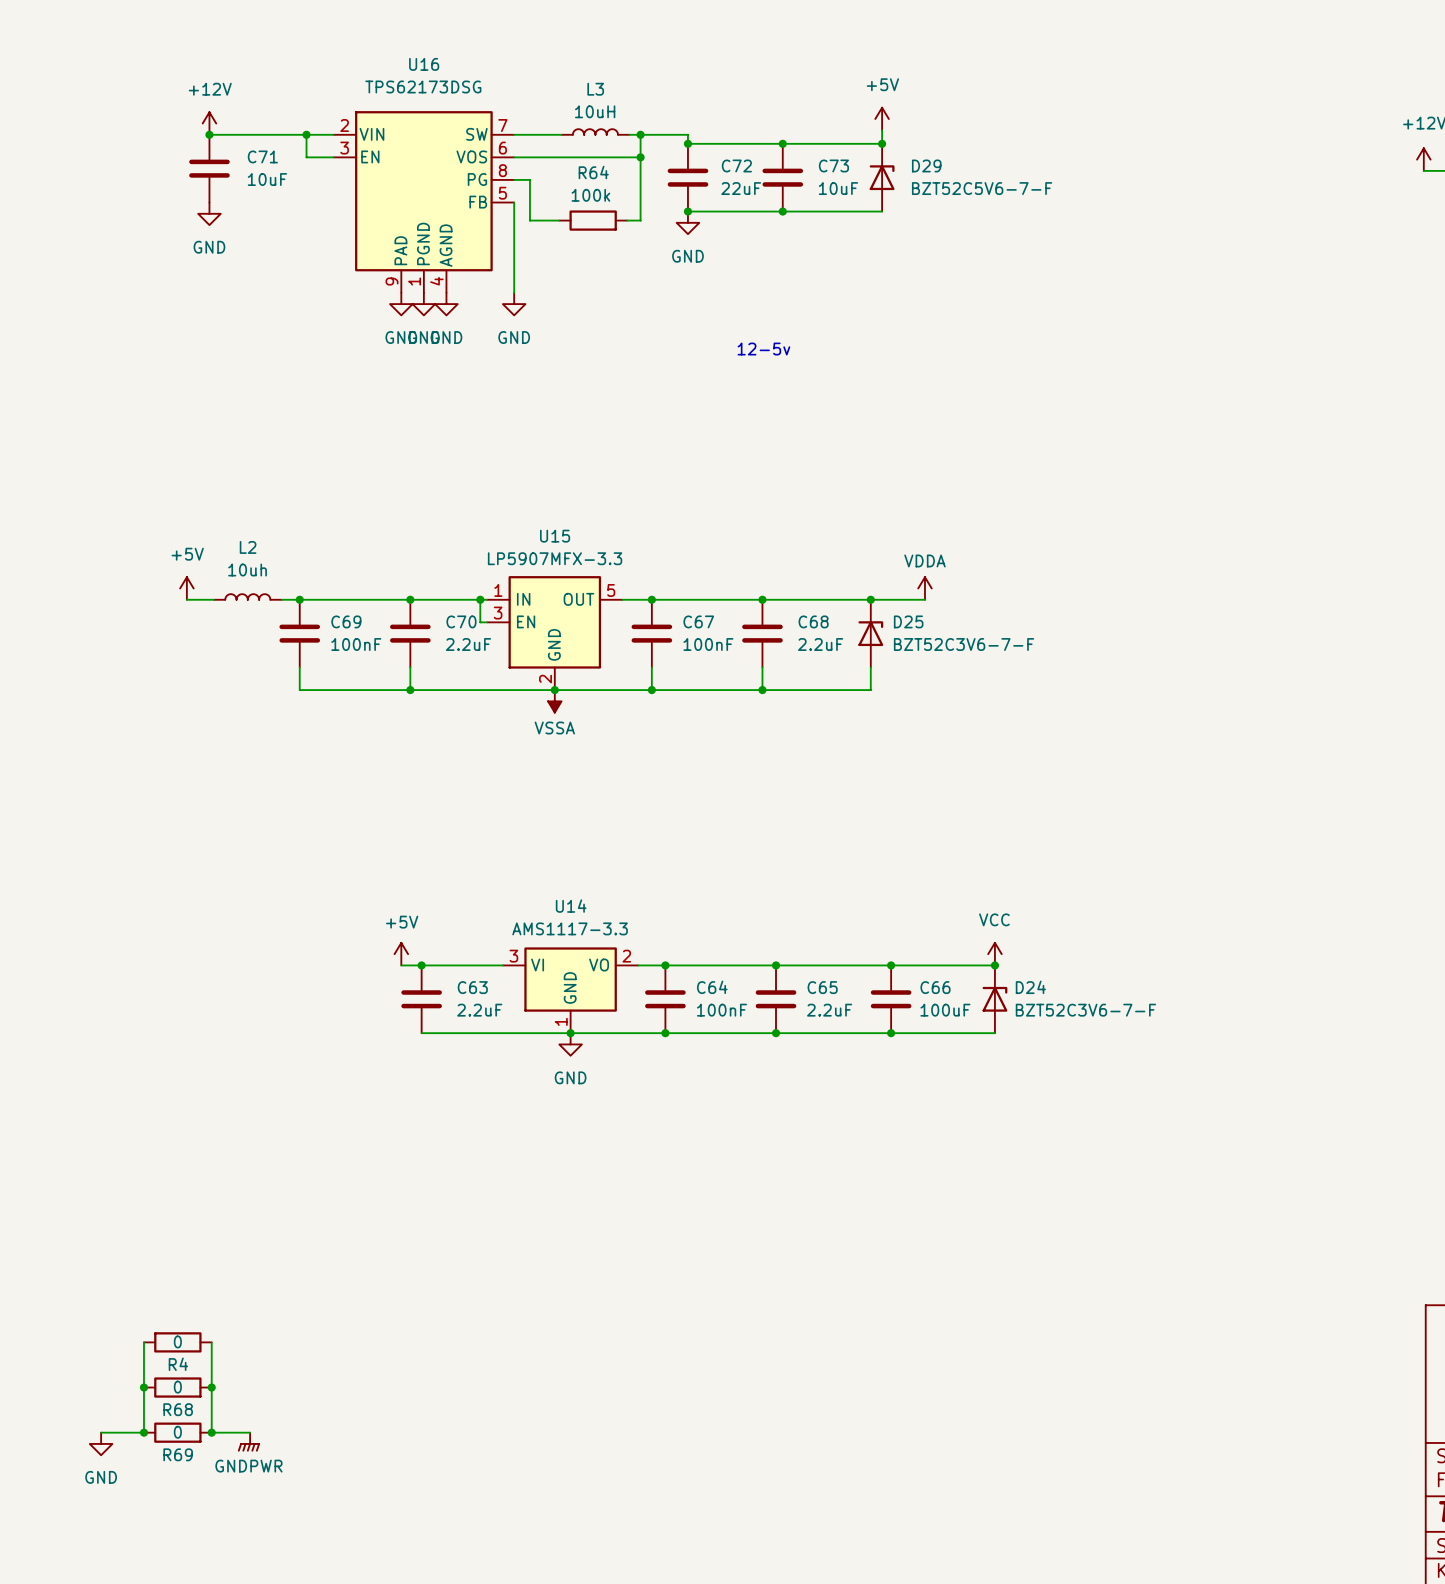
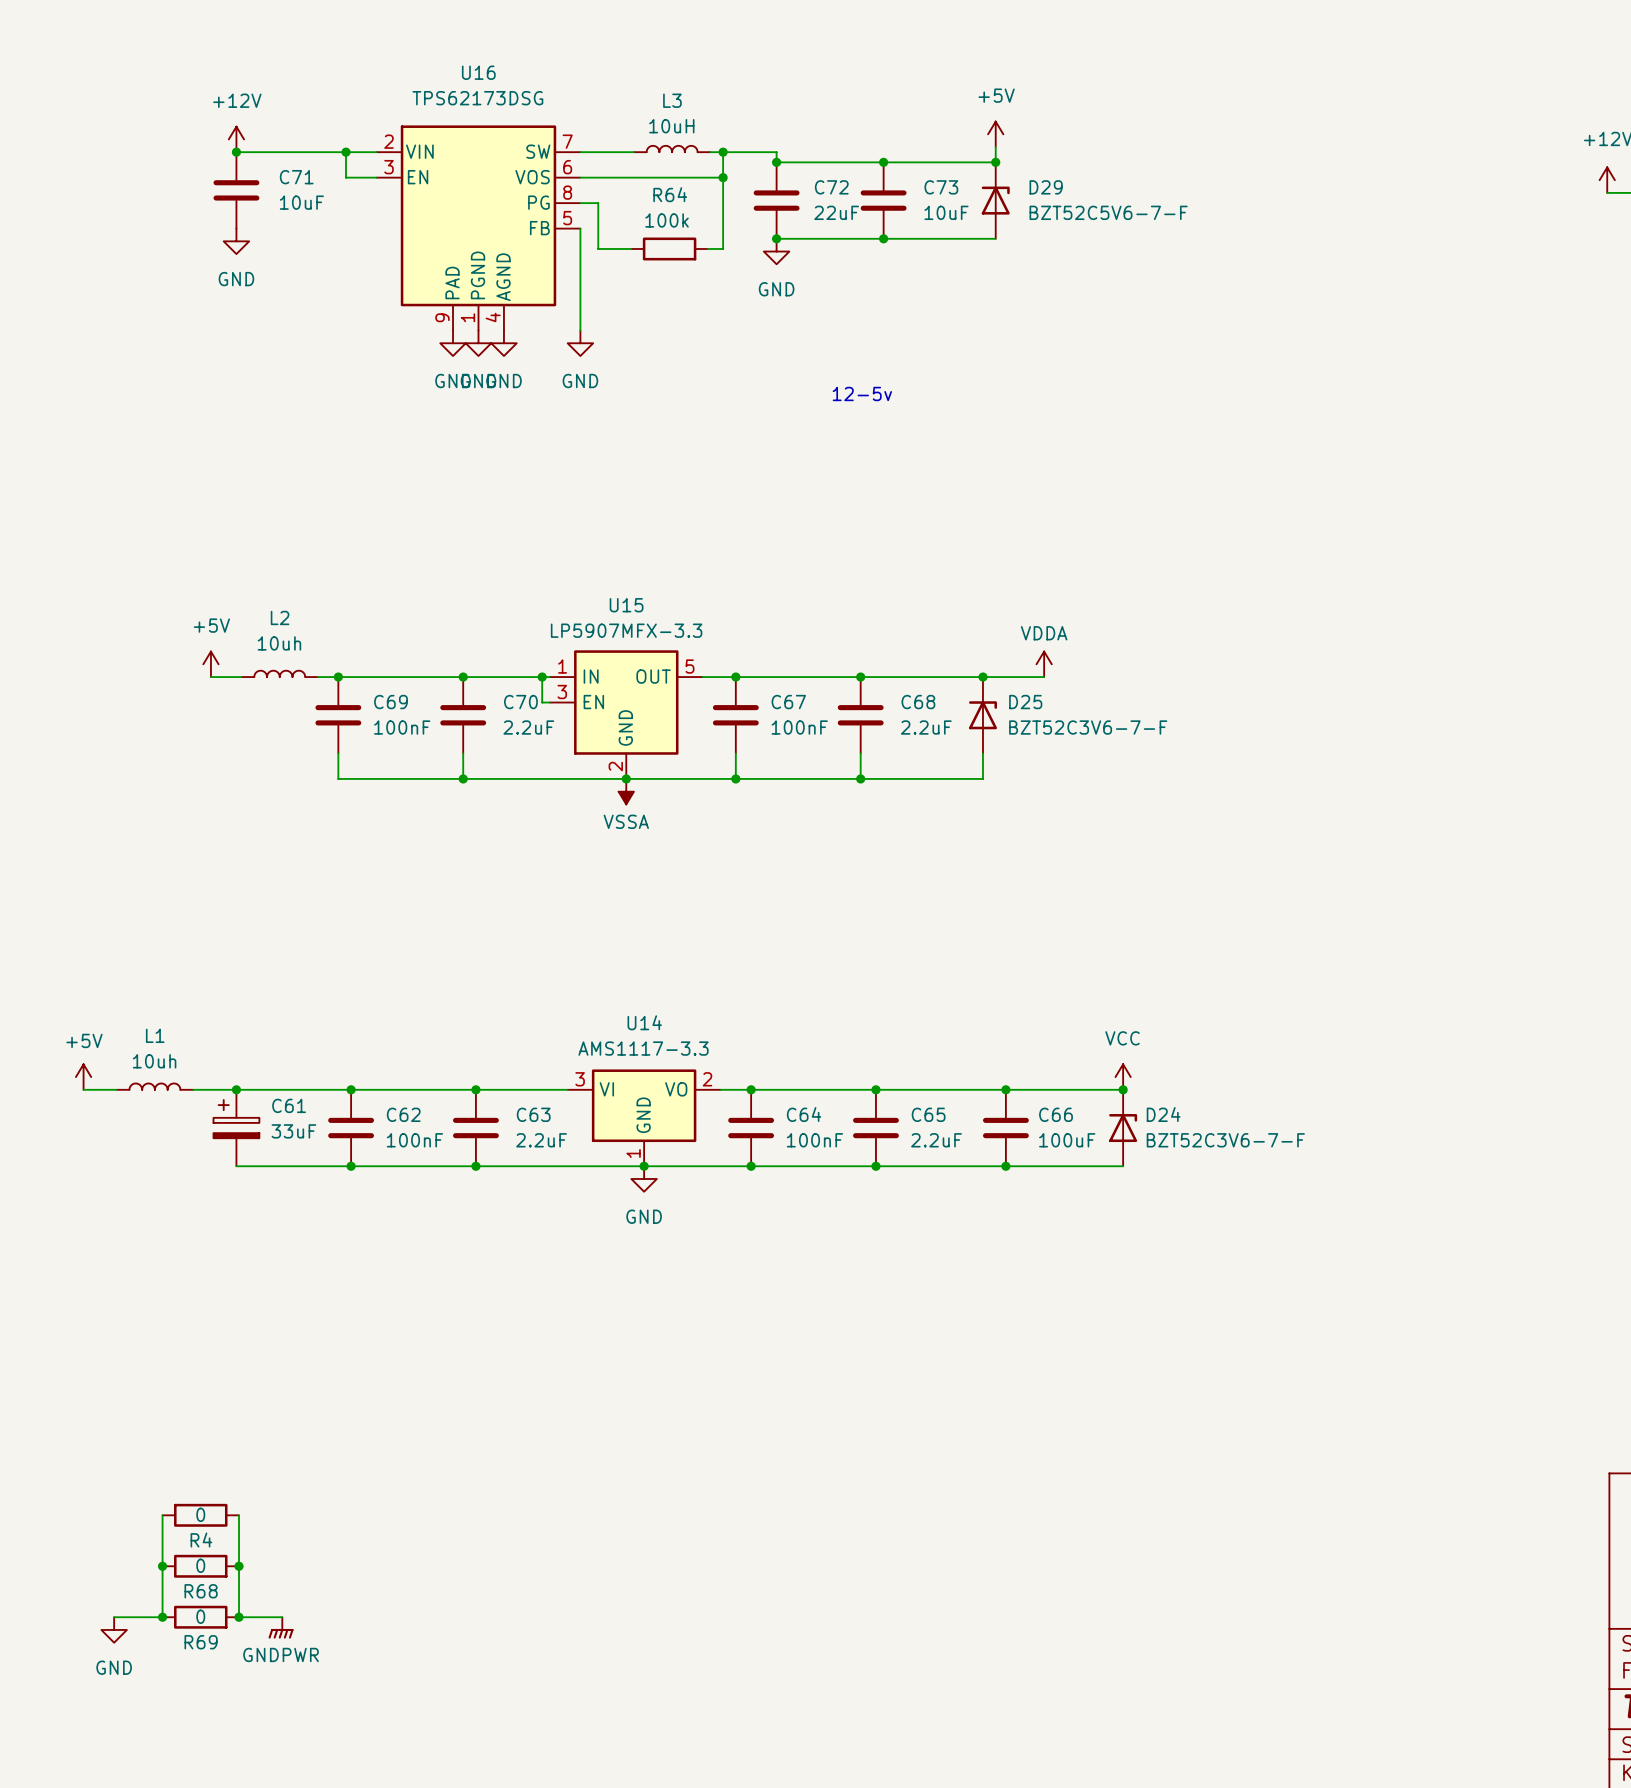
power symbol: none -> +5V (83, 1077)
power symbol: +5V (401, 954) -> none
L1: none -> 10uh (154, 1086)
wire: none -> (83, 1089) (116, 1089)
wire: none -> (193, 1089) (453, 1089)
junction: none -> (236, 1089)
junction: none -> (351, 1089)
C61: none -> 33uF (236, 1128)
C62: none -> 100nF (351, 1128)
wire: none -> (236, 1166) (475, 1166)
junction: none -> (351, 1166)
junction: none -> (475, 1166)

